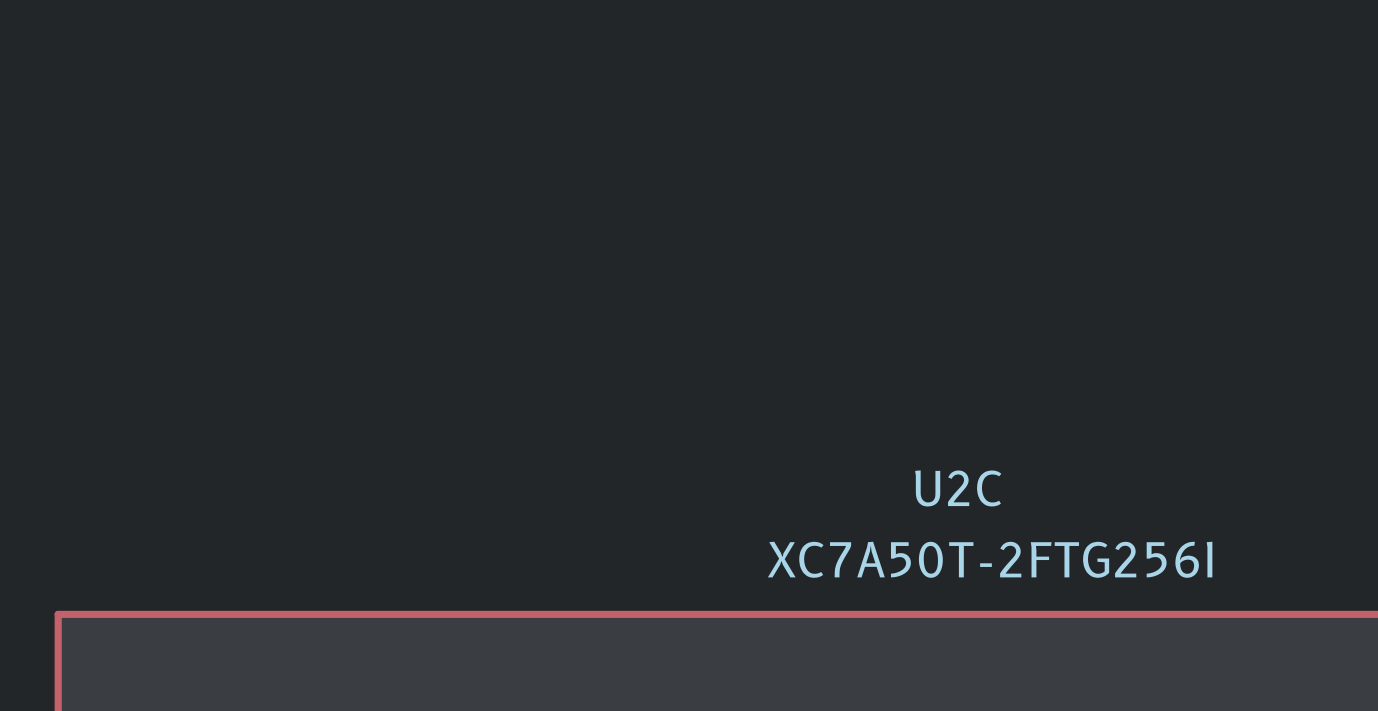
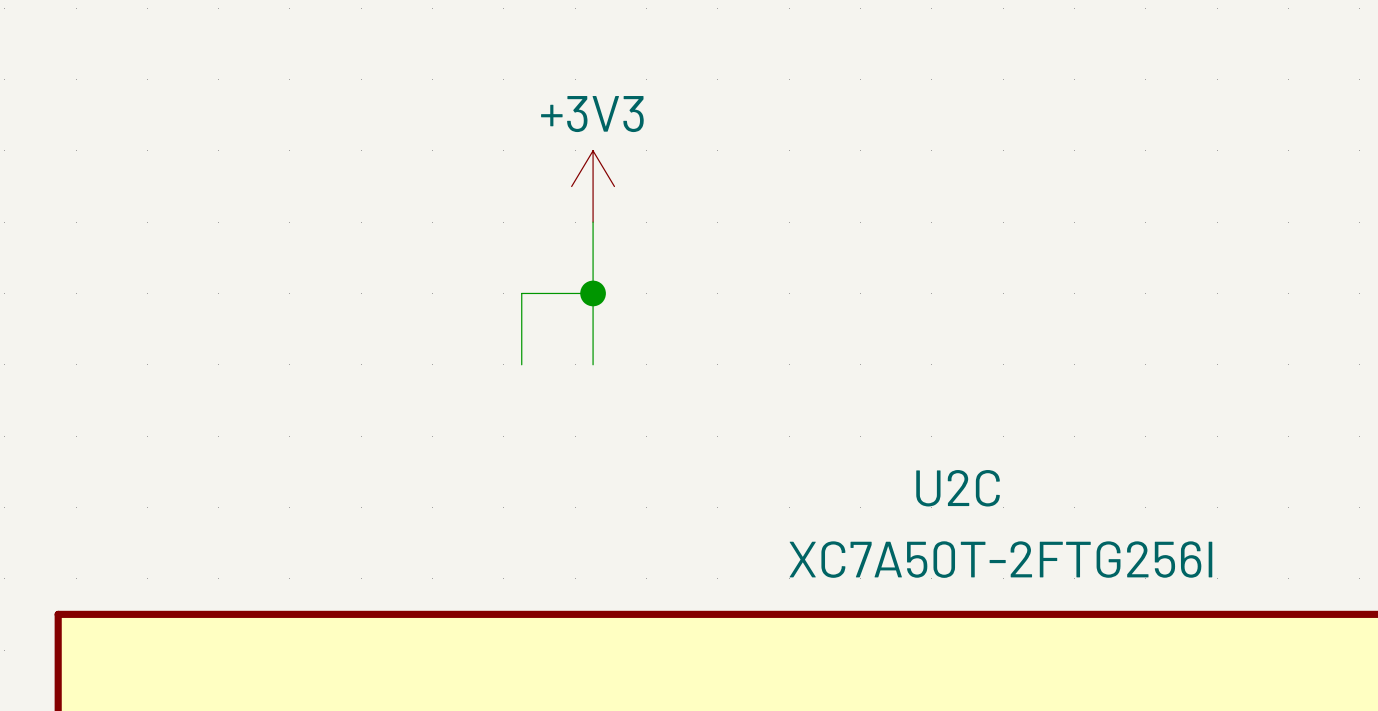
power symbol: none -> +3V3 (593, 186)
wire: none -> (593, 222) (593, 364)
wire: none -> (593, 293) (521, 293) (521, 364)
junction: none -> (593, 293)

